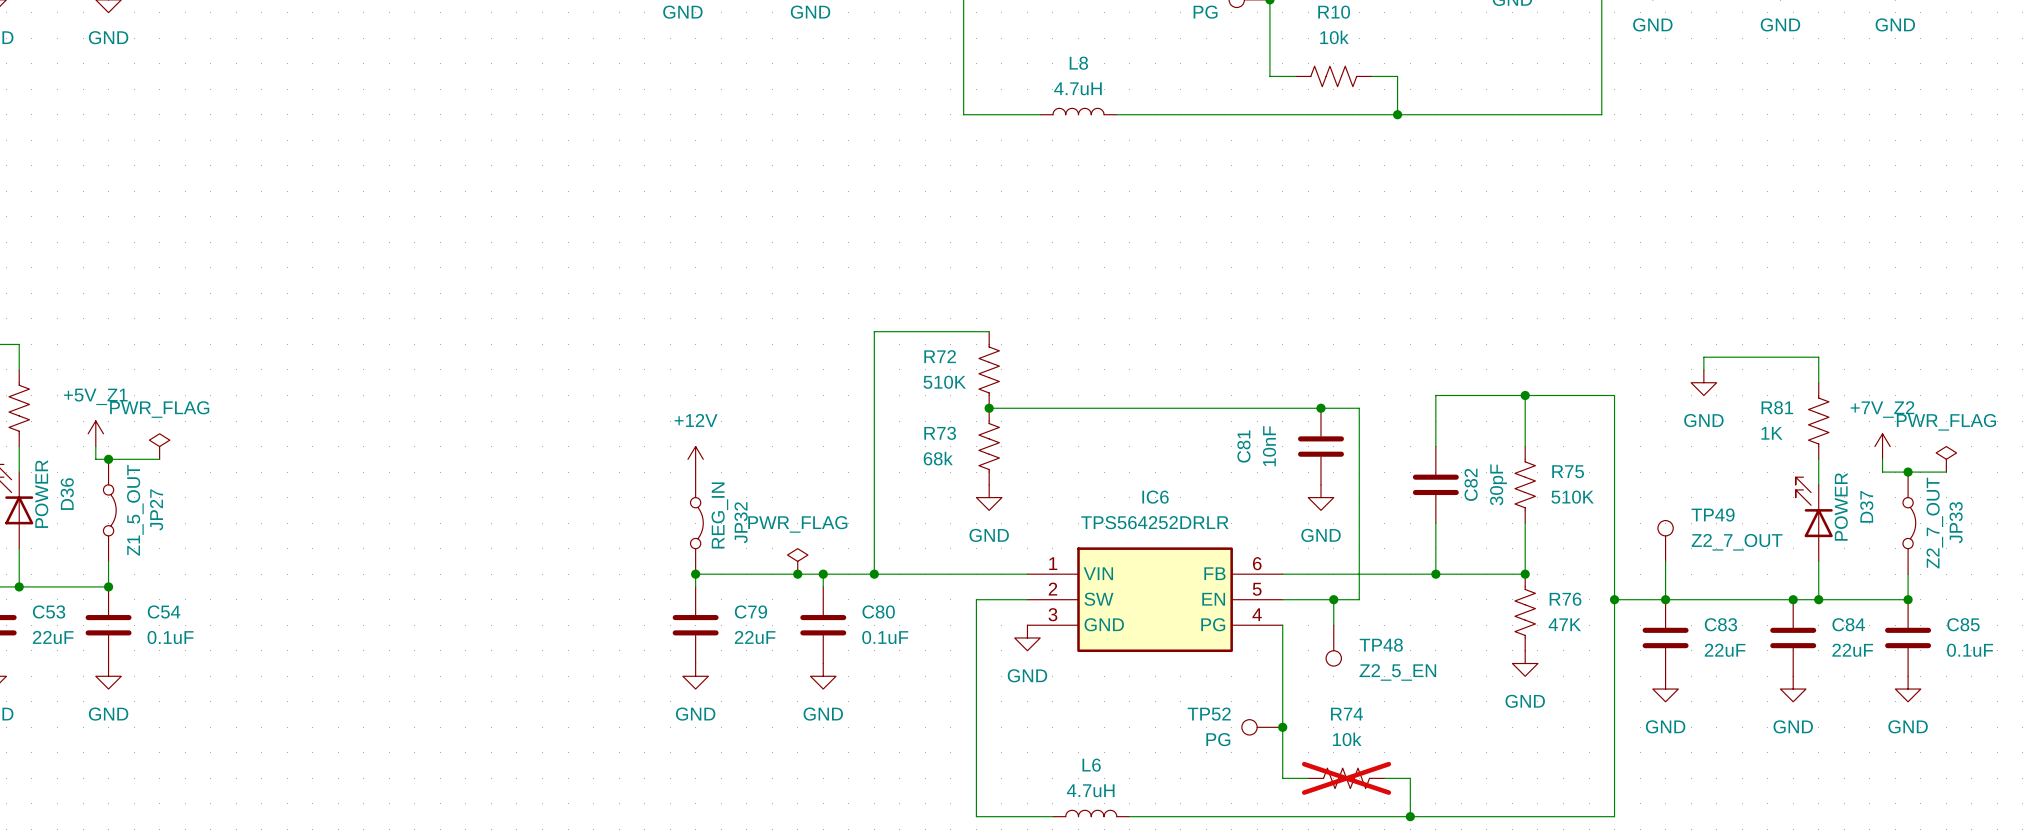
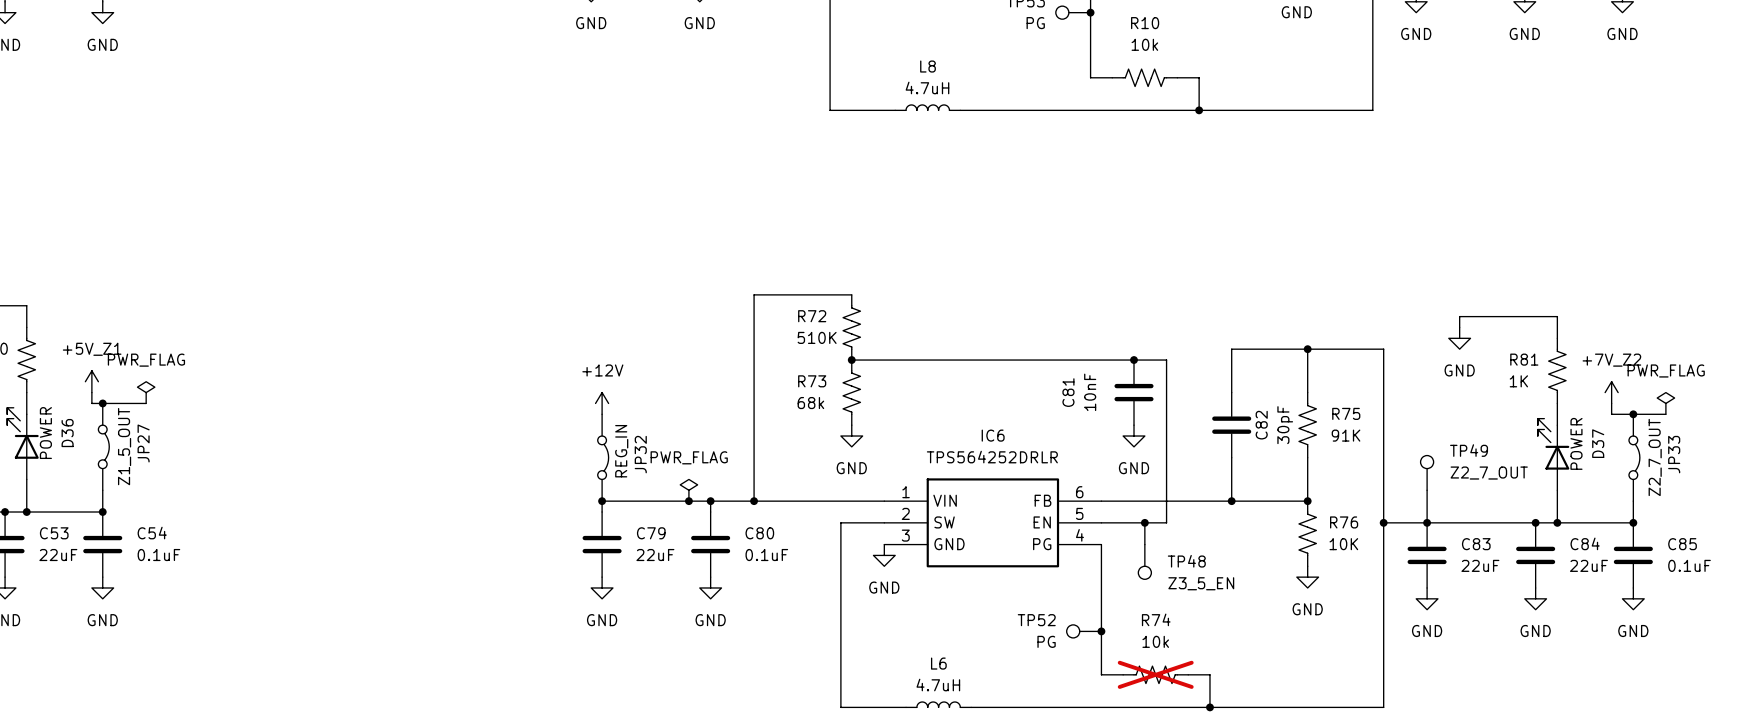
R75 value: 510K (1572, 497) -> 91K (1346, 435)
R76 value: 47K (1564, 624) -> 10K (1343, 544)
TP48 value: Z2_5_EN (1398, 672) -> Z3_5_EN (1201, 583)

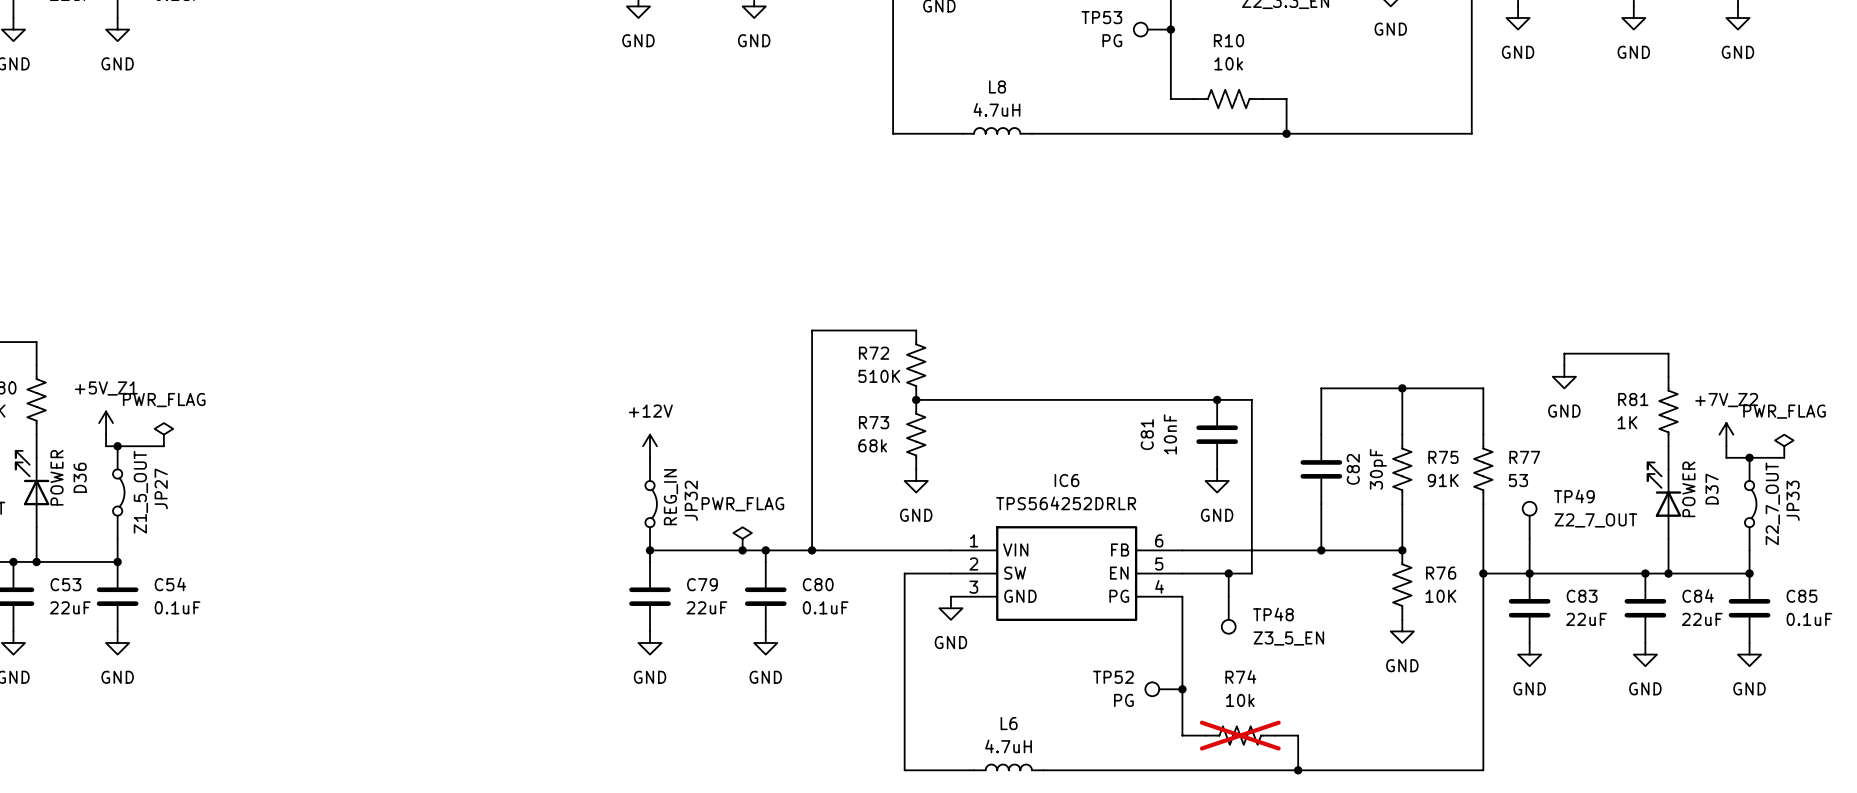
R77: none -> 53 (1483, 469)

